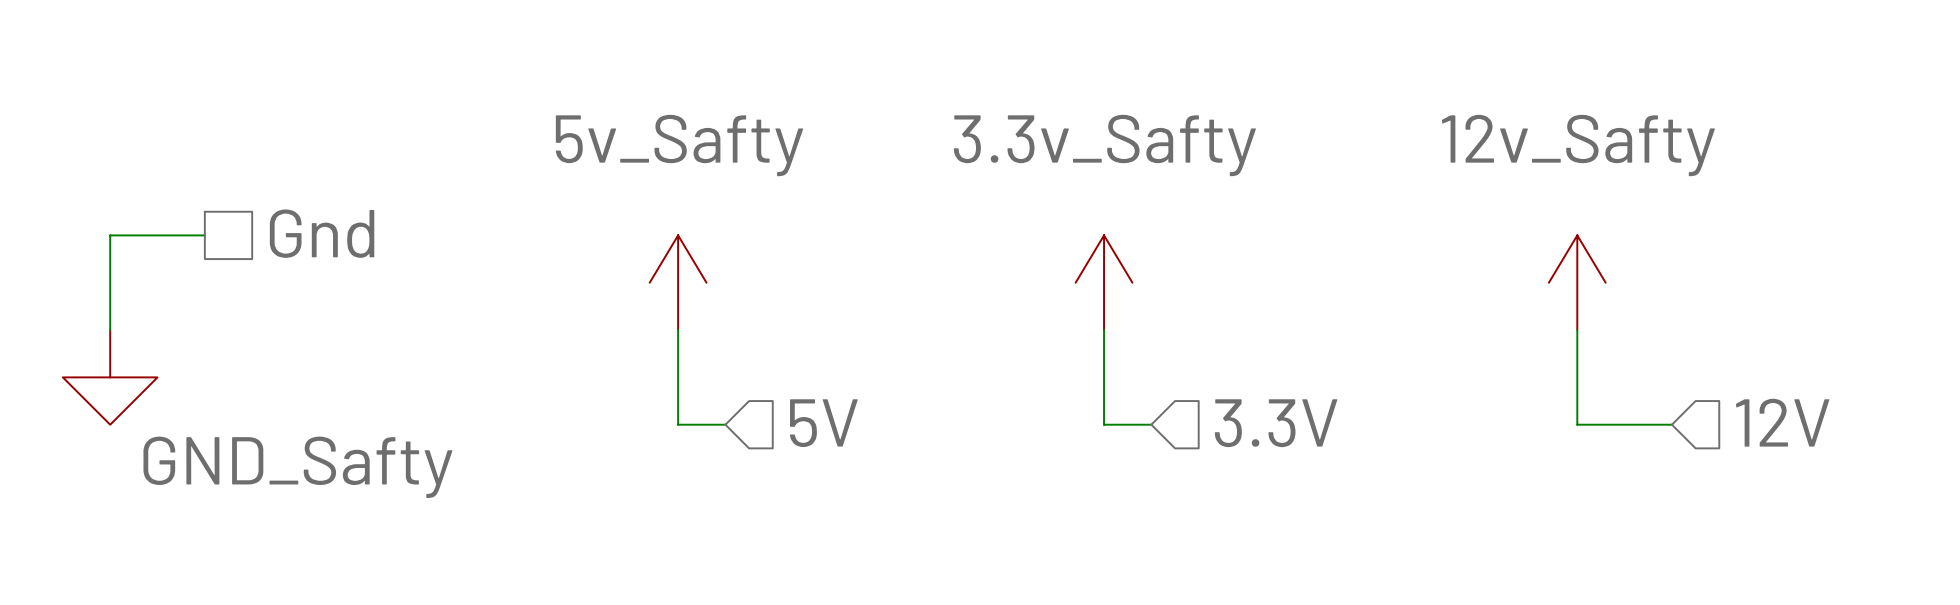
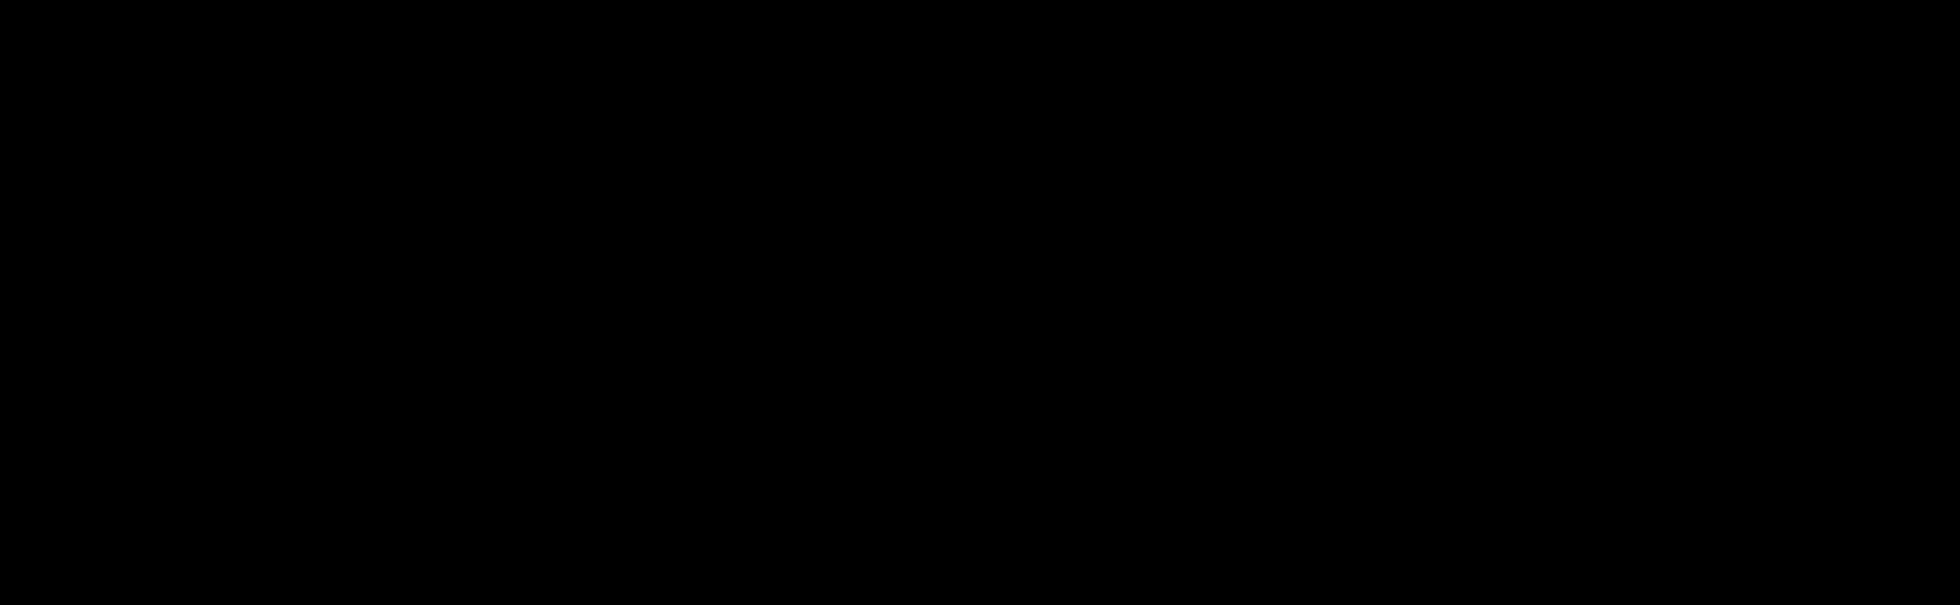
hierarchical label: Gnd (322, 233) -> none
wire: (204, 235) (110, 235) (110, 330) -> none
power symbol: 5v_Safty (678, 282) -> none
power symbol: 3.3v_Safty (1104, 282) -> none
power symbol: 12v_Safty (1577, 282) -> none
wire: (678, 330) (678, 424) (725, 424) -> none
wire: (1104, 330) (1104, 424) (1151, 424) -> none
wire: (1577, 330) (1577, 424) (1671, 424) -> none
power symbol: GND_Safty (110, 377) -> none
hierarchical label: 12V (1782, 422) -> none
hierarchical label: 5V (823, 423) -> none
hierarchical label: 3.3V (1276, 423) -> none

